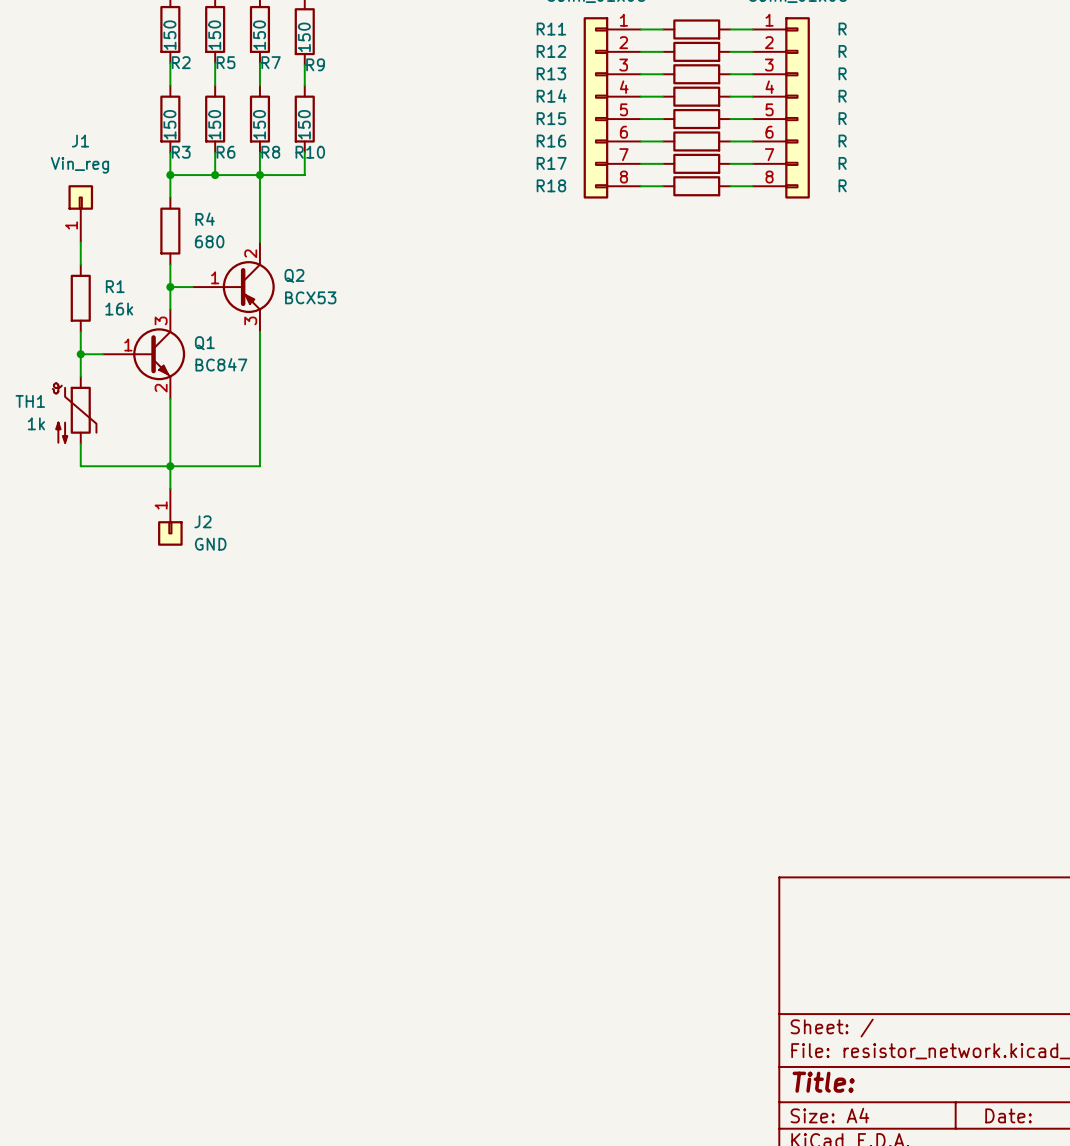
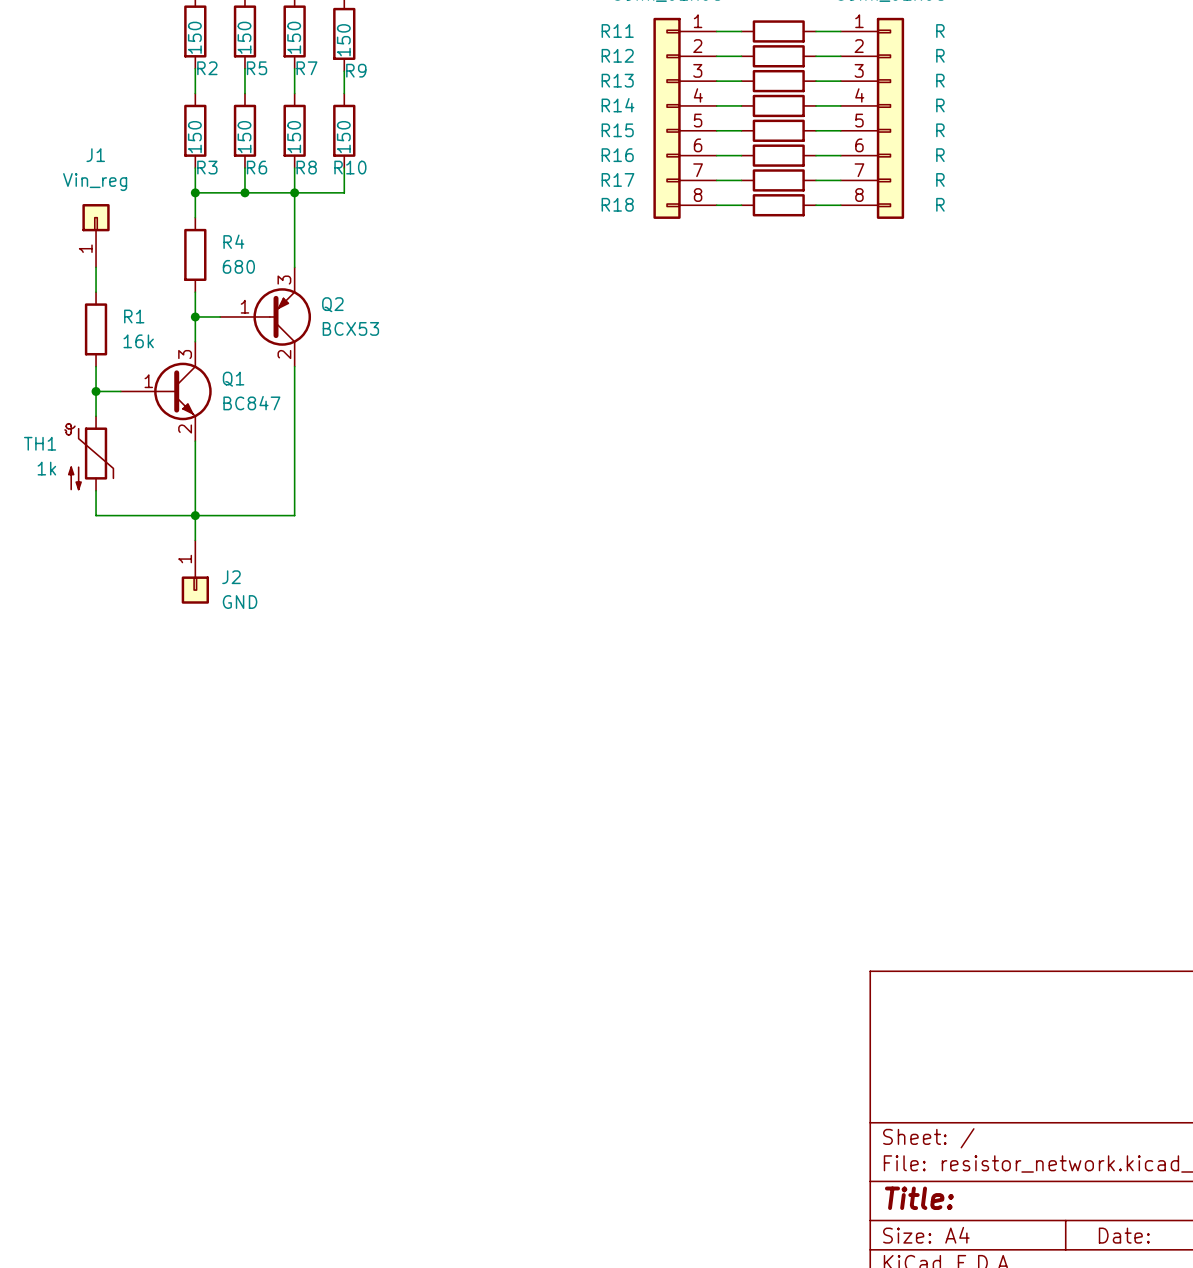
Q2 flip: as is (248, 287) -> up-down (282, 316)

